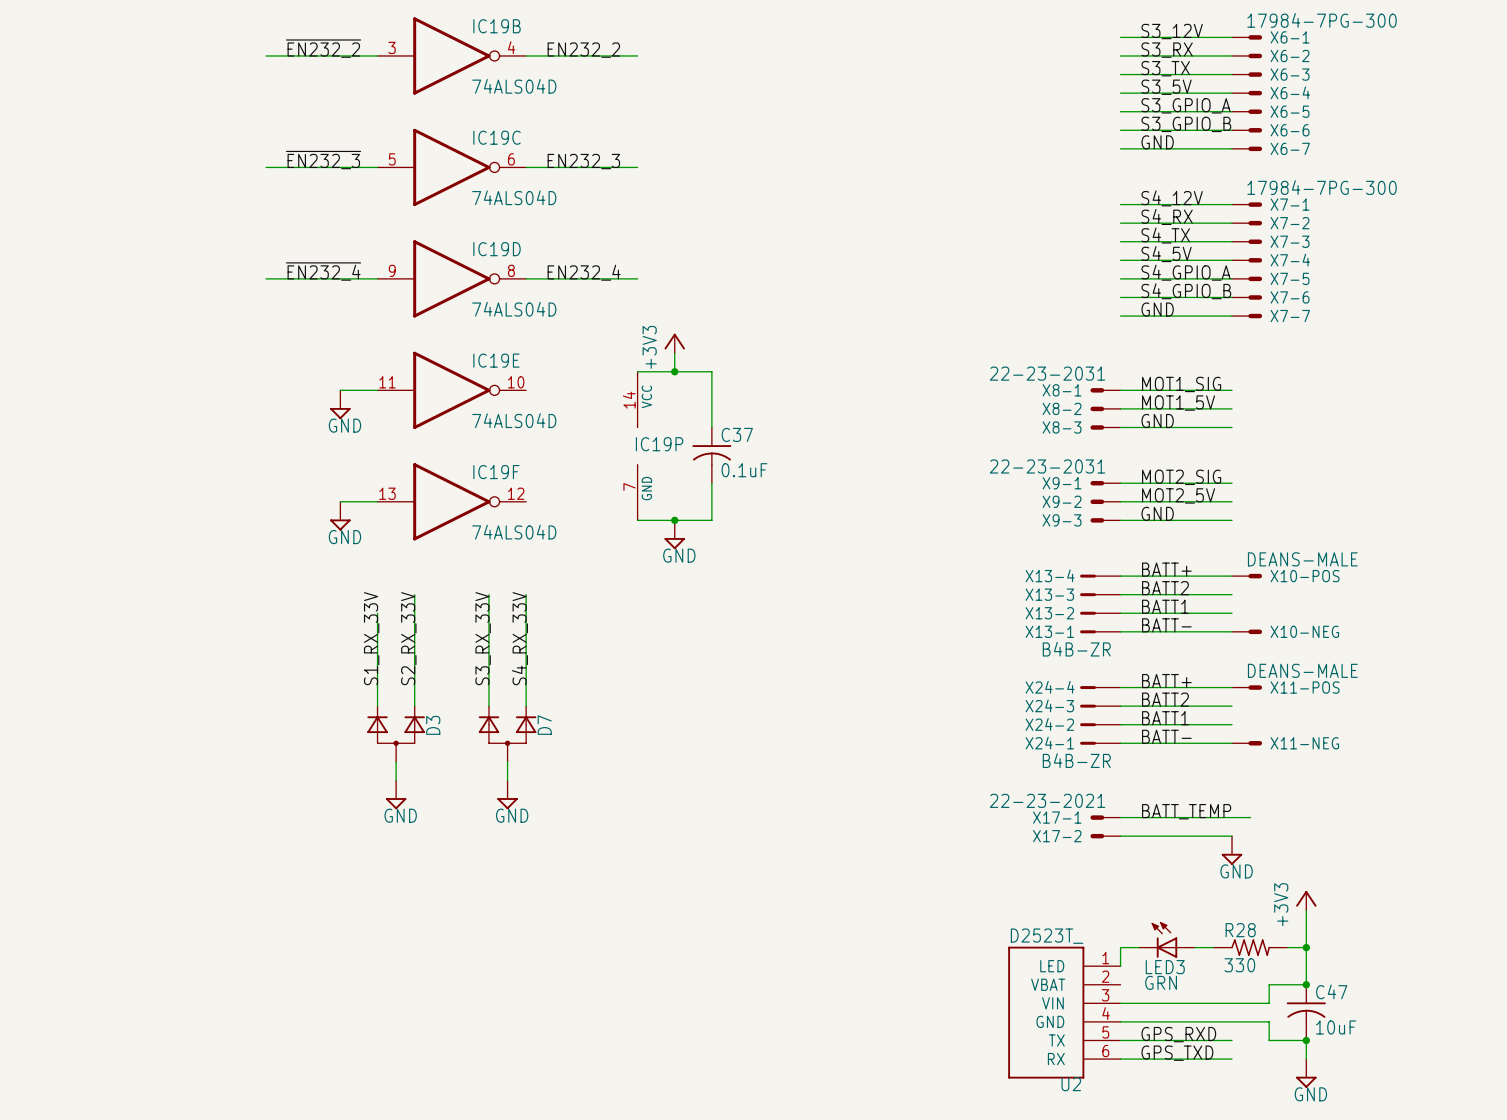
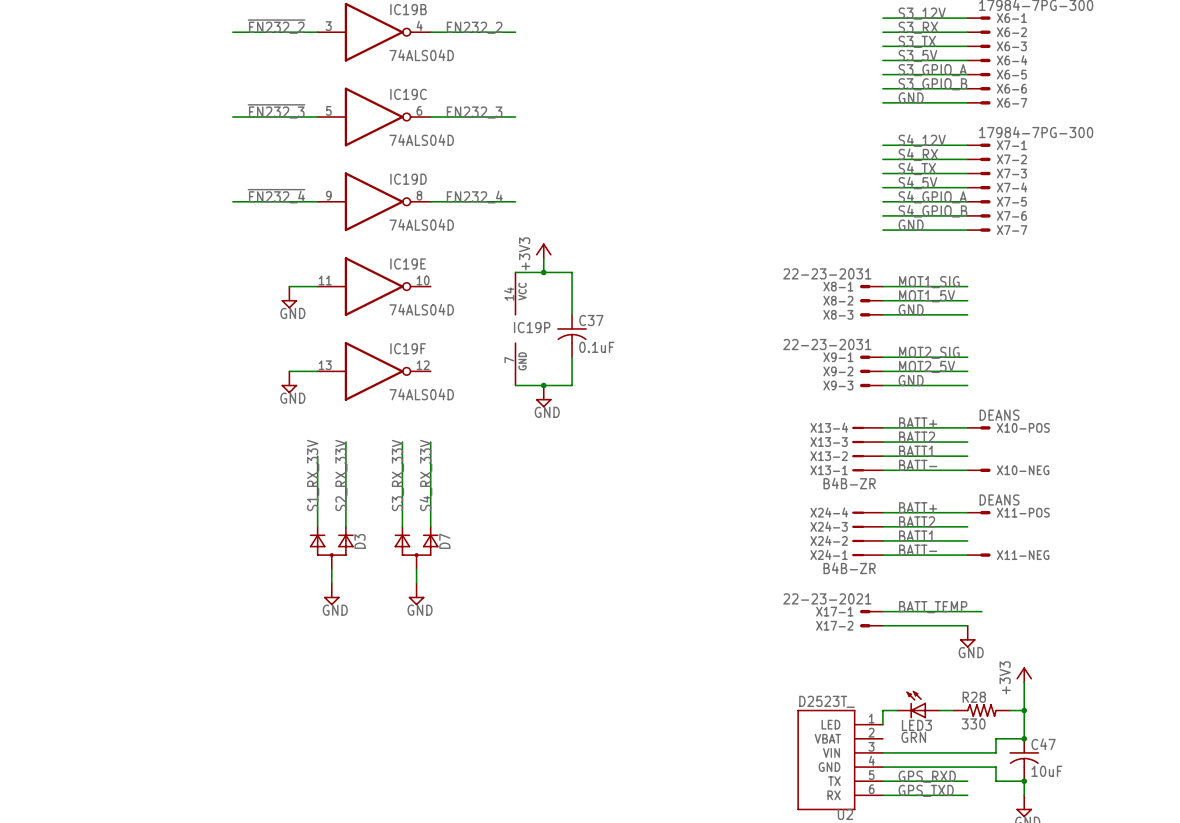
X10-POS value: DEANS-MALE (1302, 559) -> DEANS (999, 415)
X11-POS value: DEANS-MALE (1302, 670) -> DEANS (999, 499)

